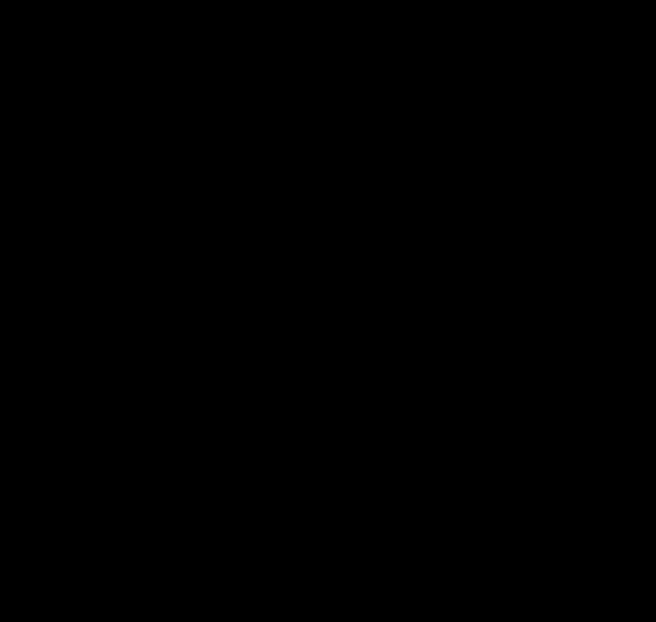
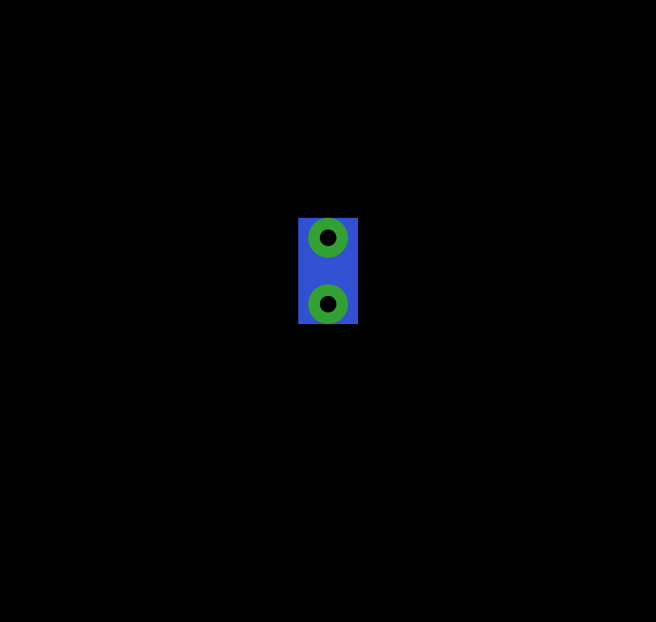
part: none -> (328, 270)

